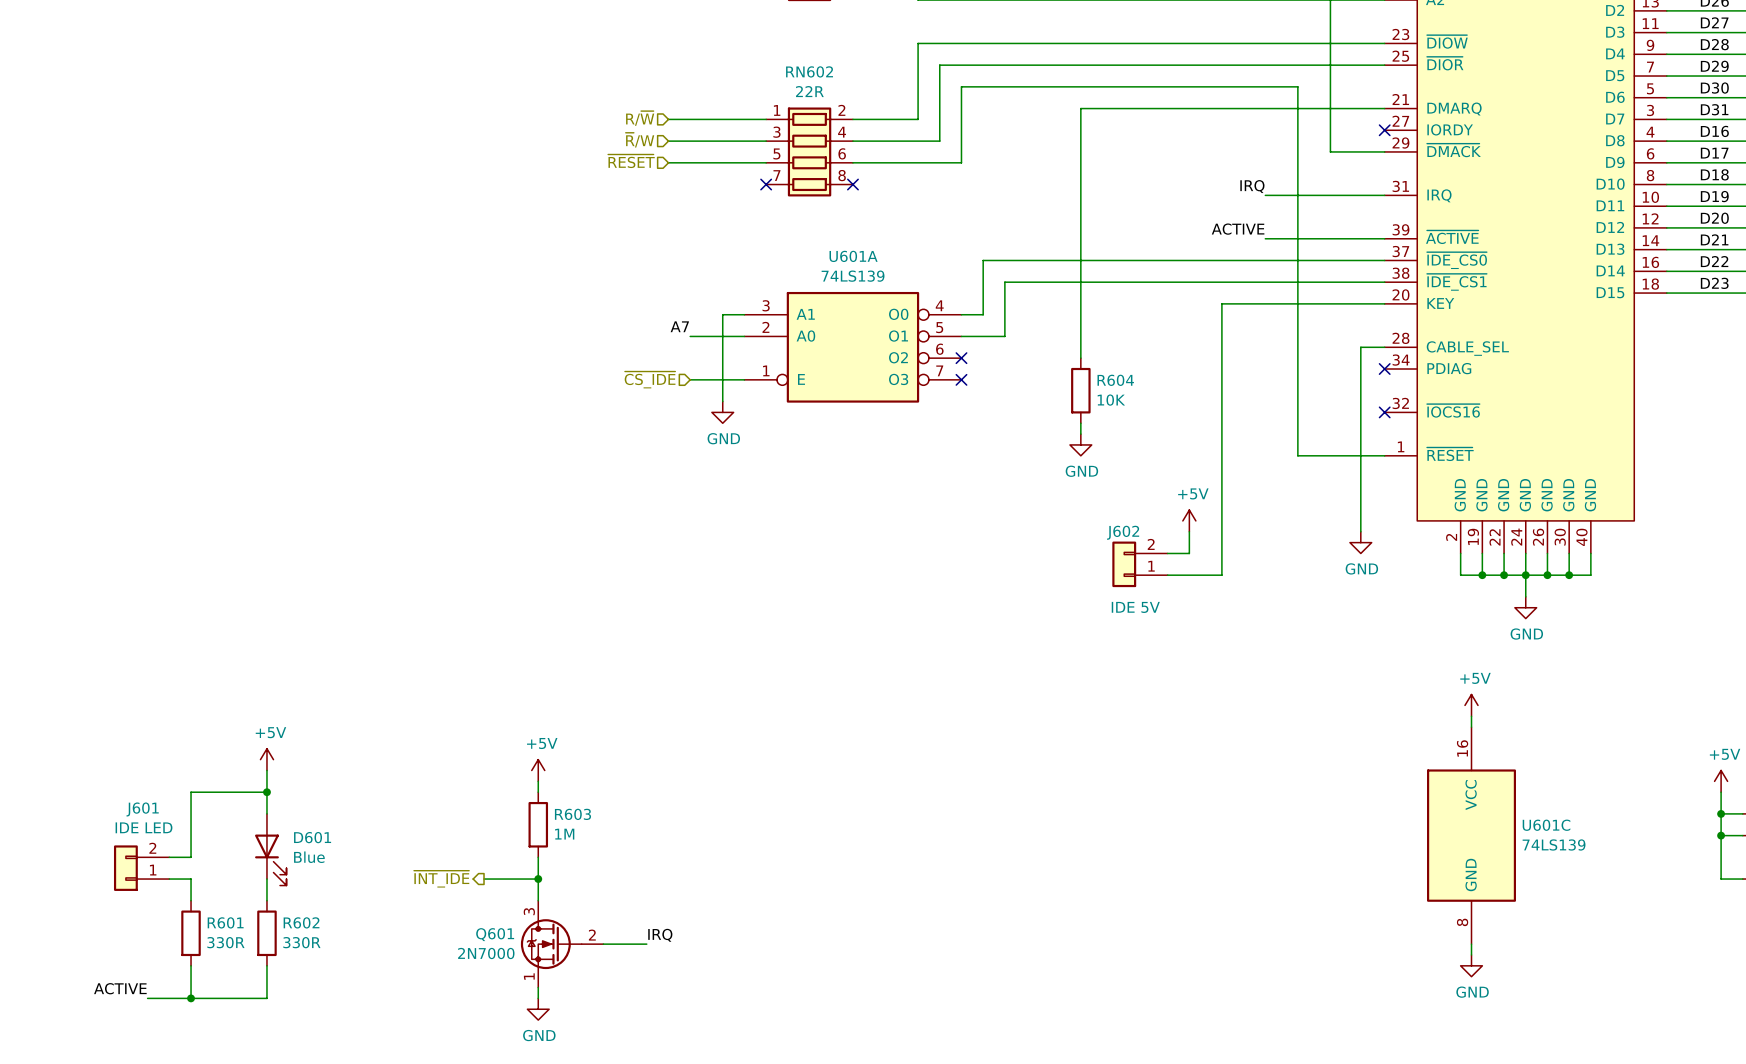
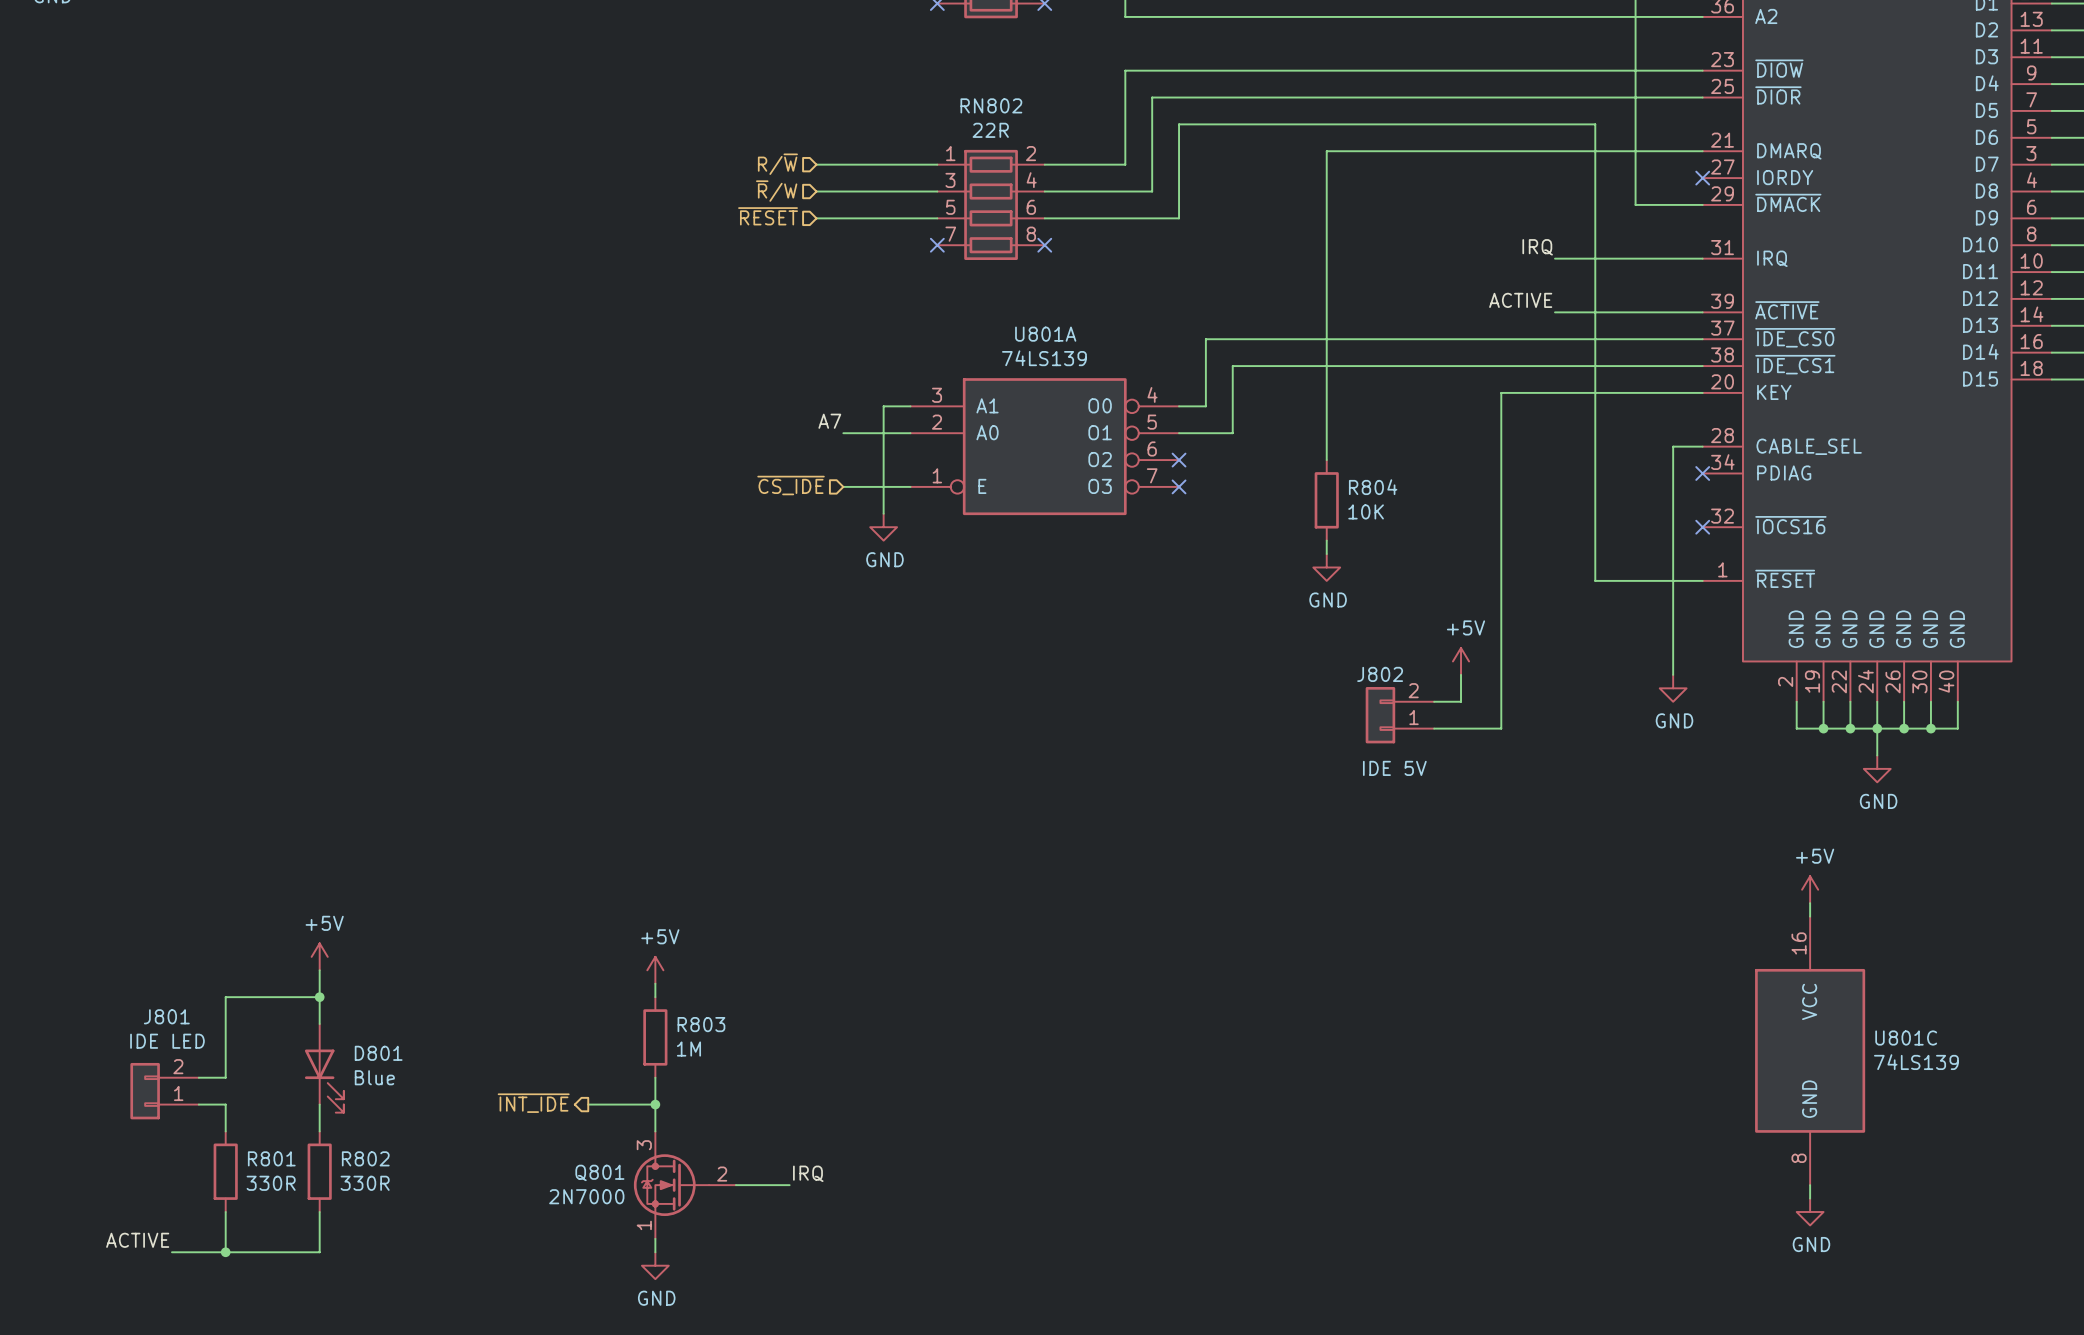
RN602 name: RN602 (809, 71) -> RN802 (991, 105)
U601A name: U601A (853, 256) -> U801A (1045, 334)
R604 name: R604 (1115, 380) -> R804 (1373, 487)
J602 name: J602 (1123, 532) -> J802 (1380, 674)
J601 name: J601 (142, 809) -> J801 (166, 1016)
R603 name: R603 (572, 814) -> R803 (701, 1024)
U601C name: U601C (1546, 825) -> U801C (1906, 1038)
D601 name: D601 (312, 837) -> D801 (378, 1053)
R601 name: R601 (225, 922) -> R801 (271, 1158)
R602 name: R602 (301, 922) -> R802 (365, 1158)
Q601 name: Q601 (495, 934) -> Q801 (599, 1172)

